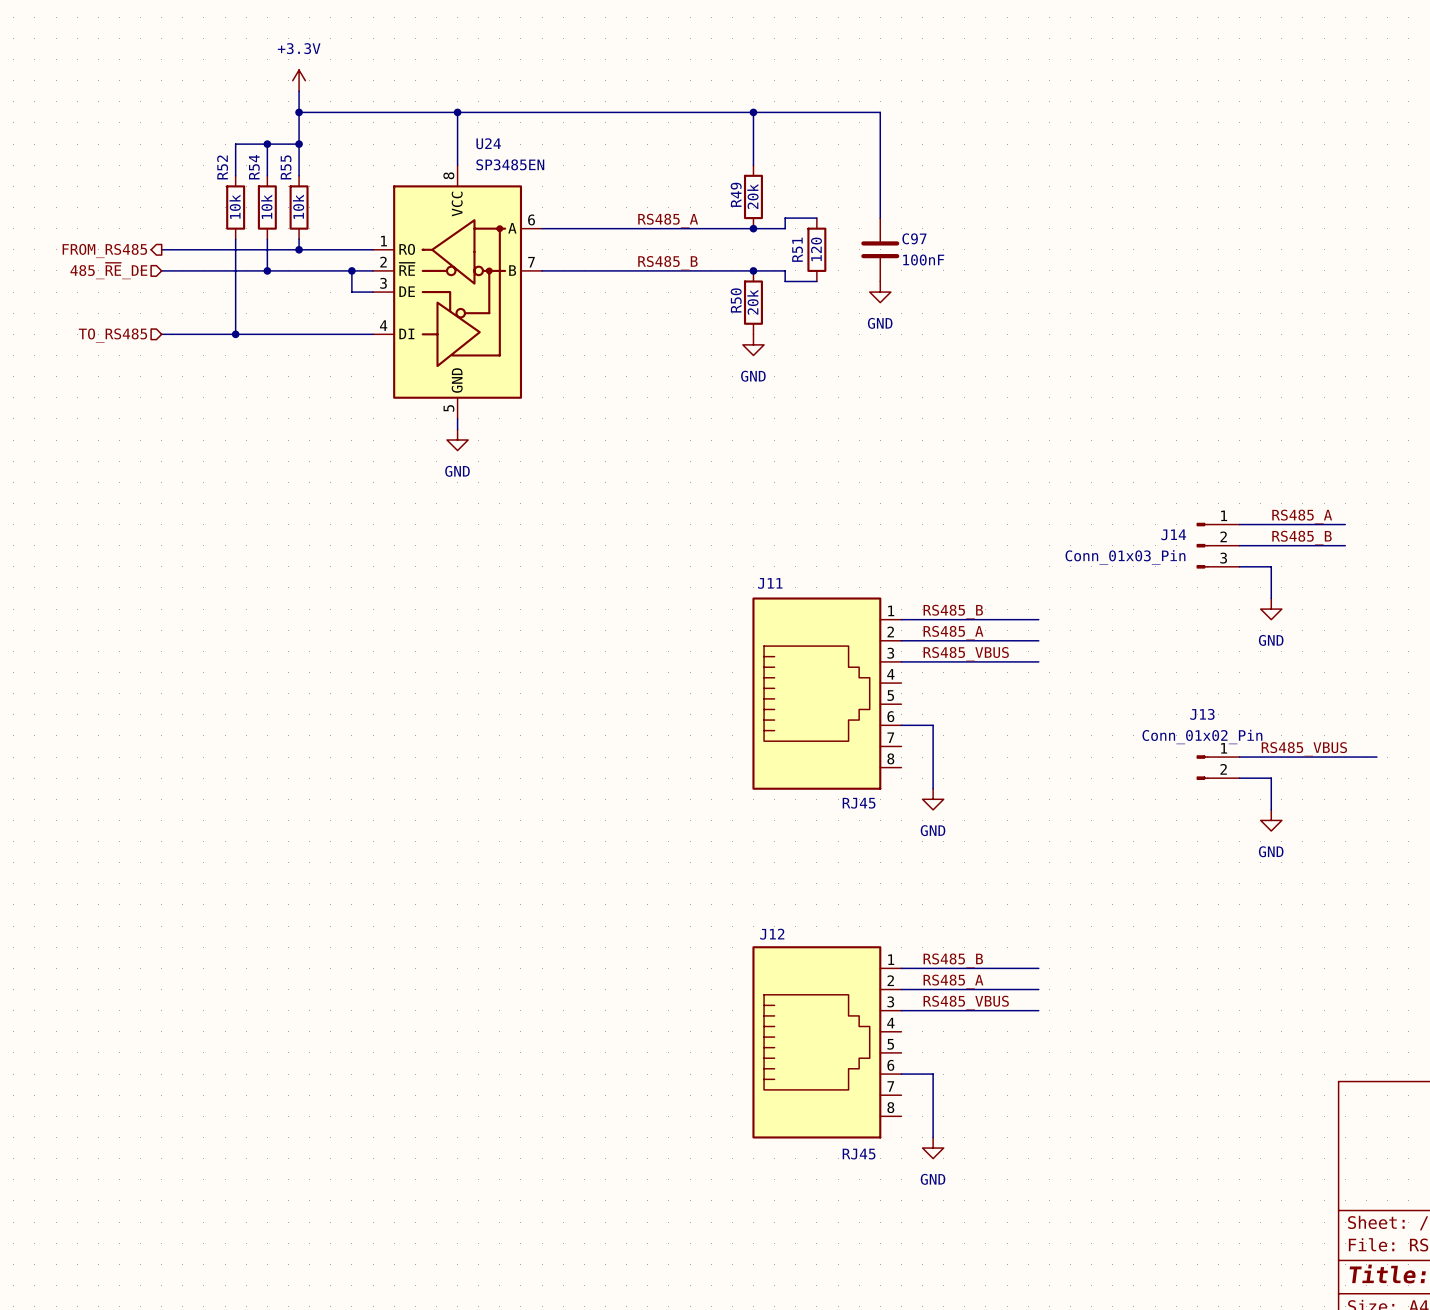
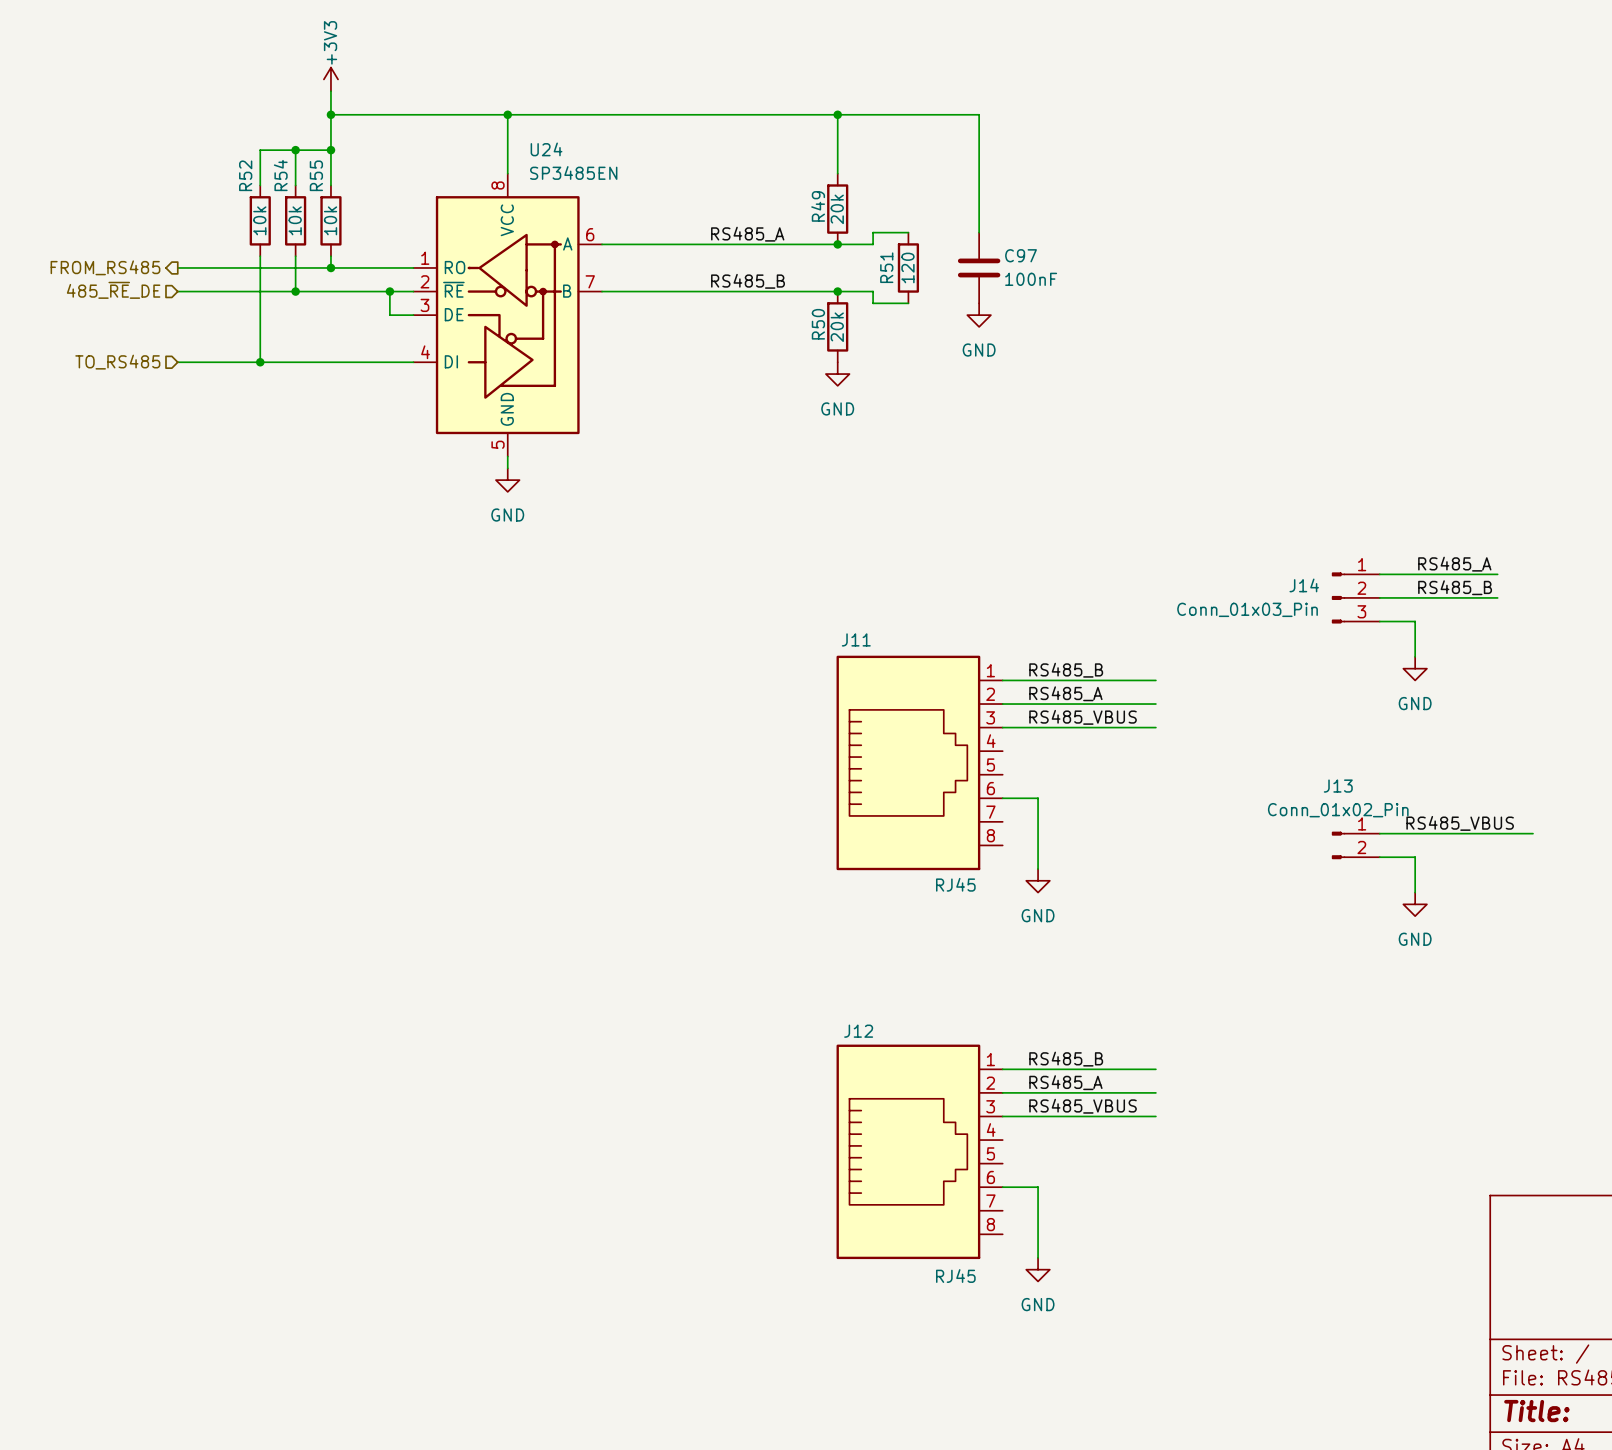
power symbol: +3.3V (299, 80) -> +3V3 (330, 79)

